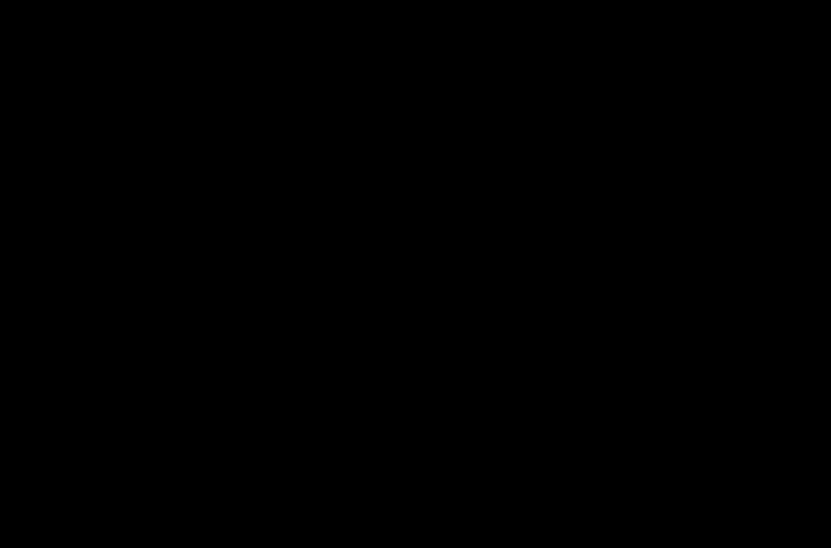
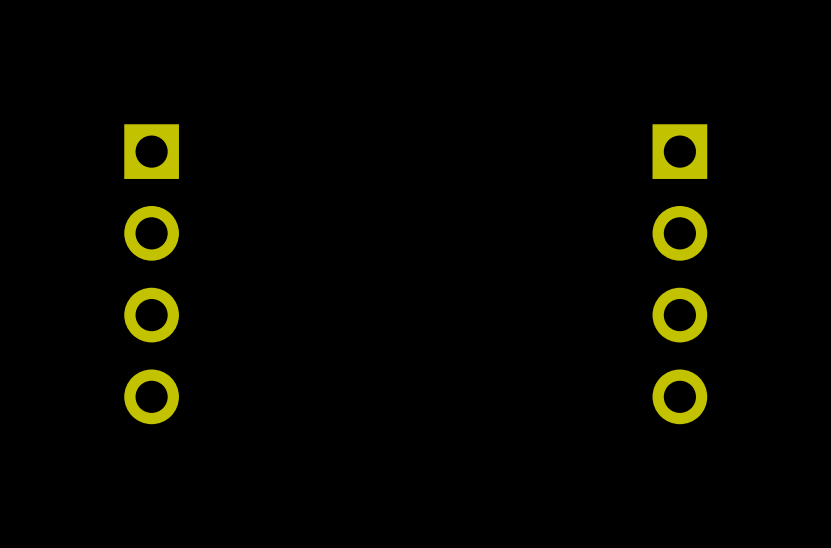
part: none -> (151, 274)
part: none -> (679, 274)

